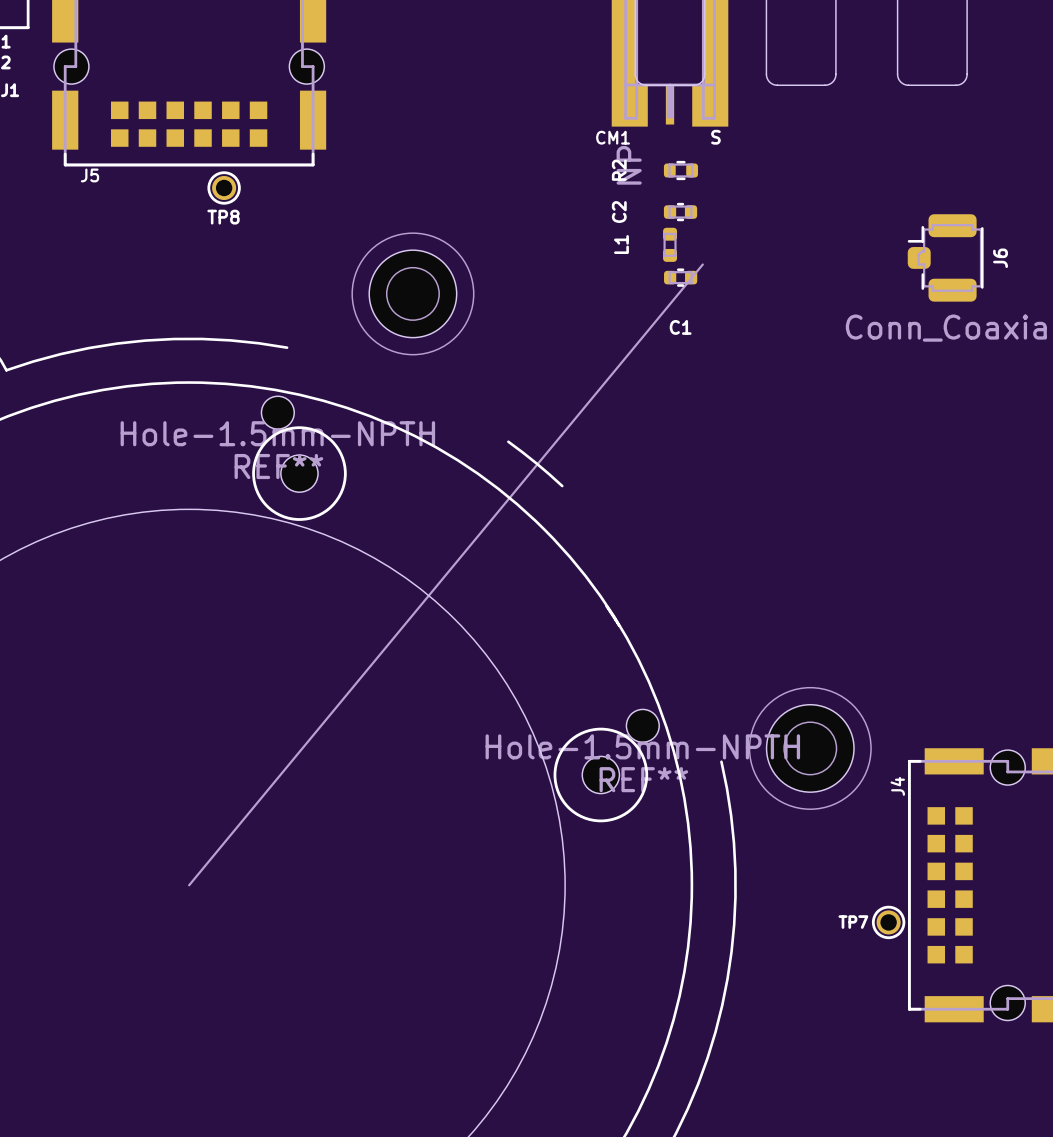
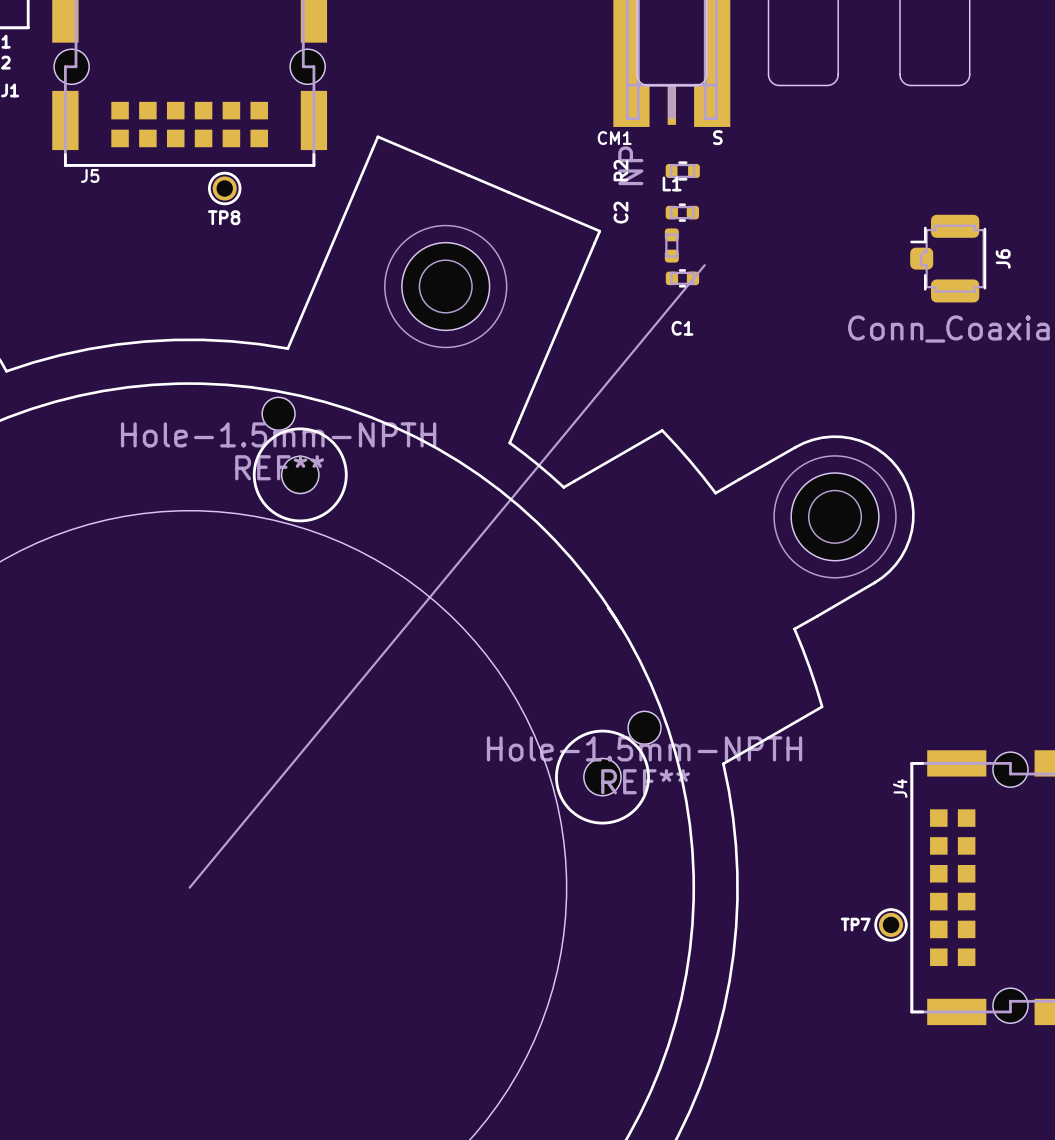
L1 name rotation: 0° (621, 244) -> 90° clockwise (672, 183)
L1 name position: L1 (621, 244) -> L1 (672, 183)
part position: (412, 293) -> (445, 286)
line: none -> (287, 348) (377, 136) (599, 231) (509, 442)
line: none -> (563, 487) (662, 430) (715, 493) (795, 447) (813, 439) (831, 436) (850, 438) (868, 444) (884, 454) (902, 475) (910, 493) (913, 521) (905, 548) (895, 564) (882, 577) (794, 629) (822, 706)
line: none -> (821, 706) (723, 763)
part position: (810, 748) -> (835, 516)

